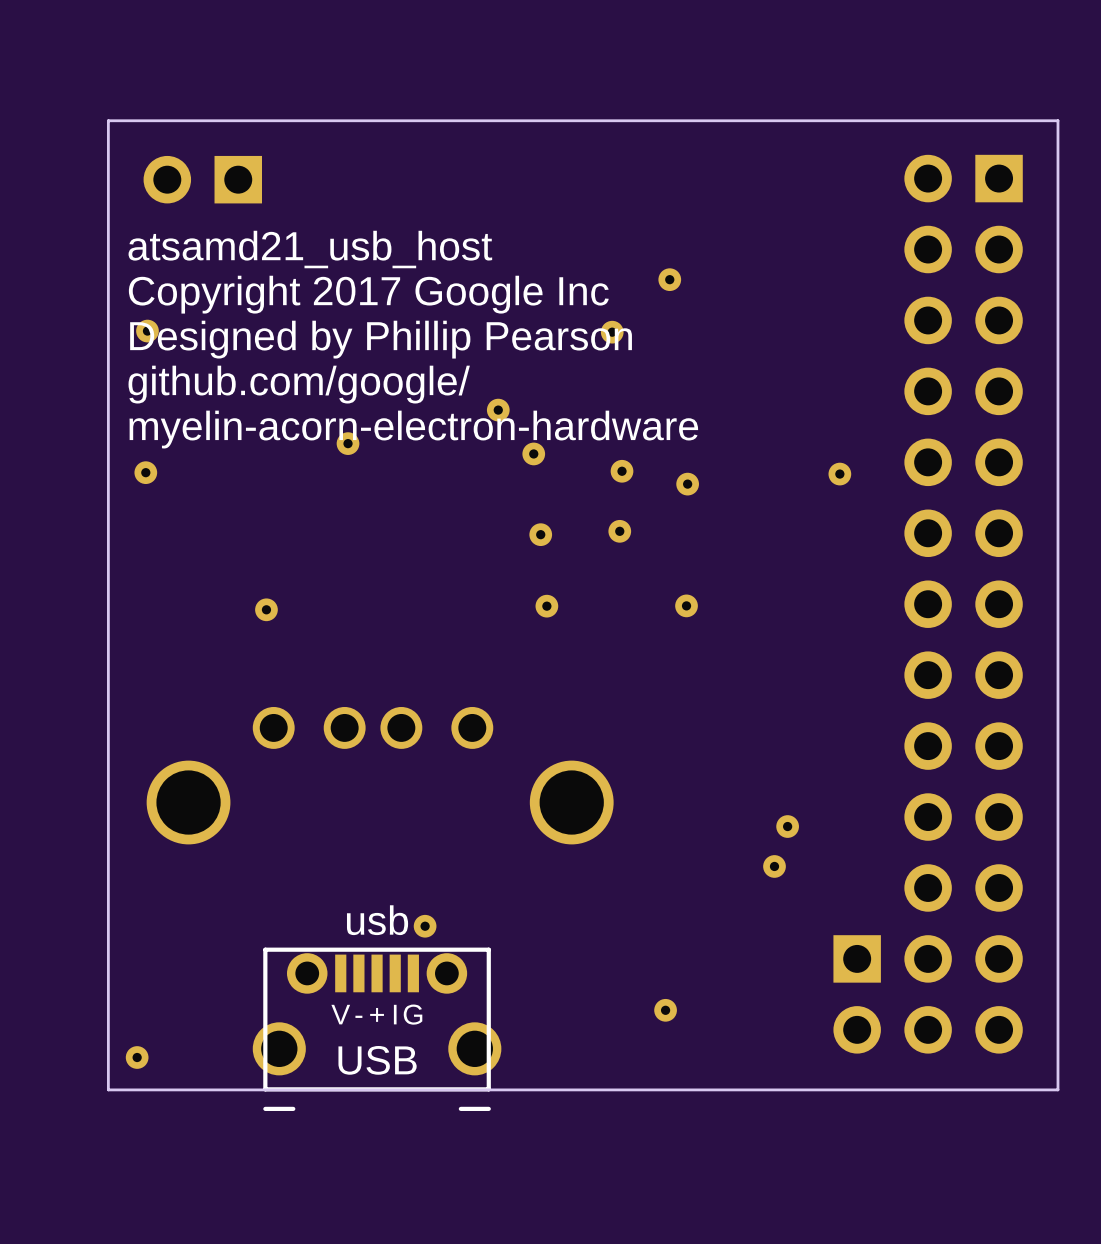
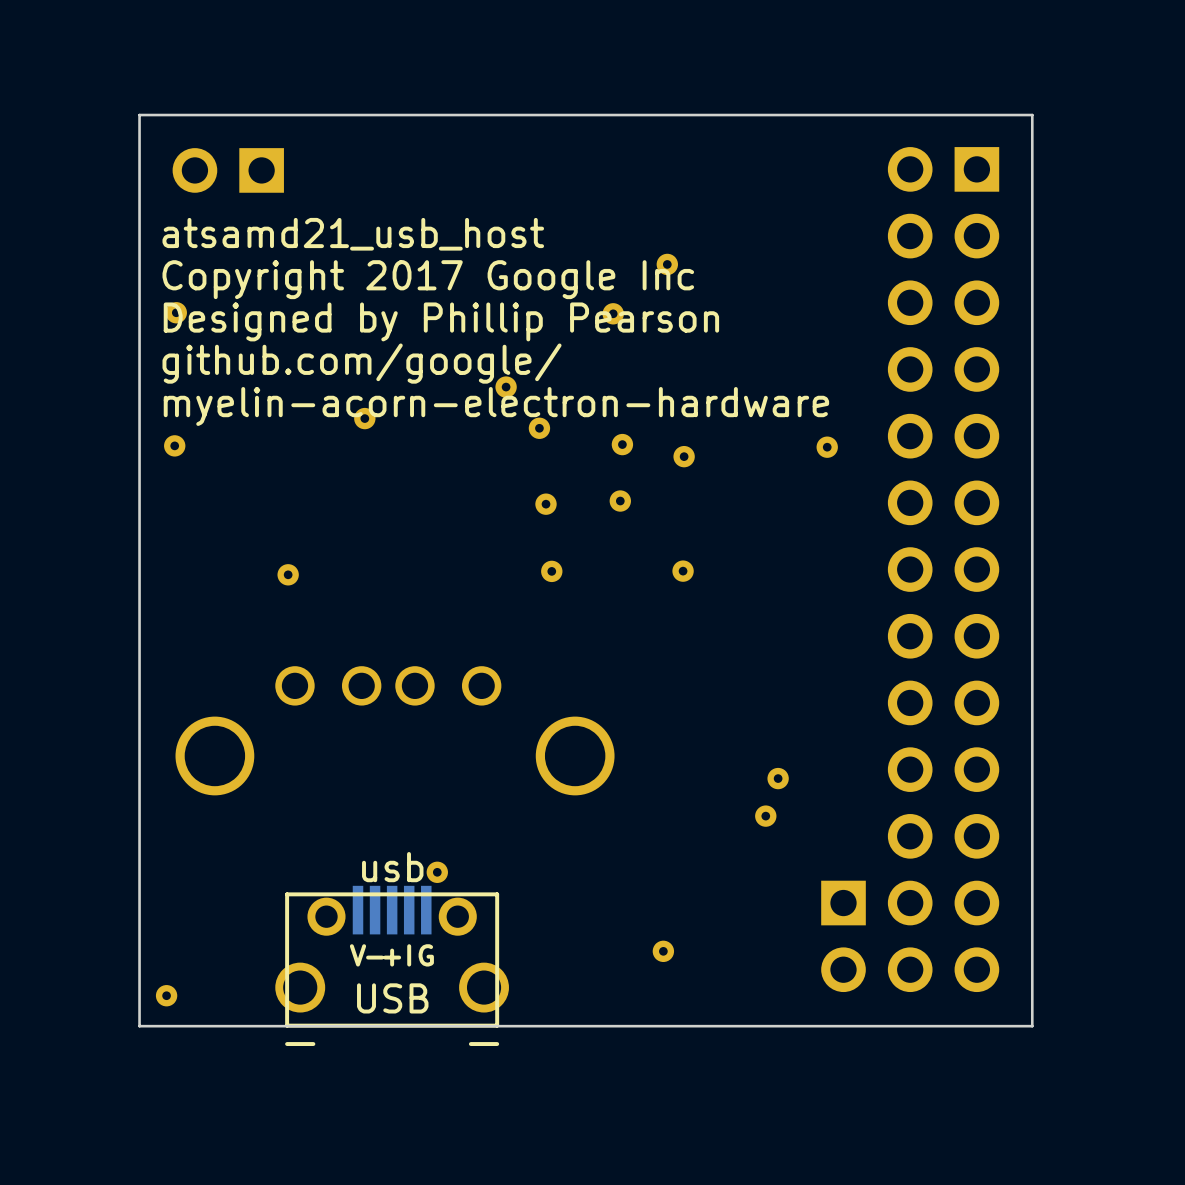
USB footprint: [252, 947, 502, 1111] -> [275, 885, 509, 1047]

